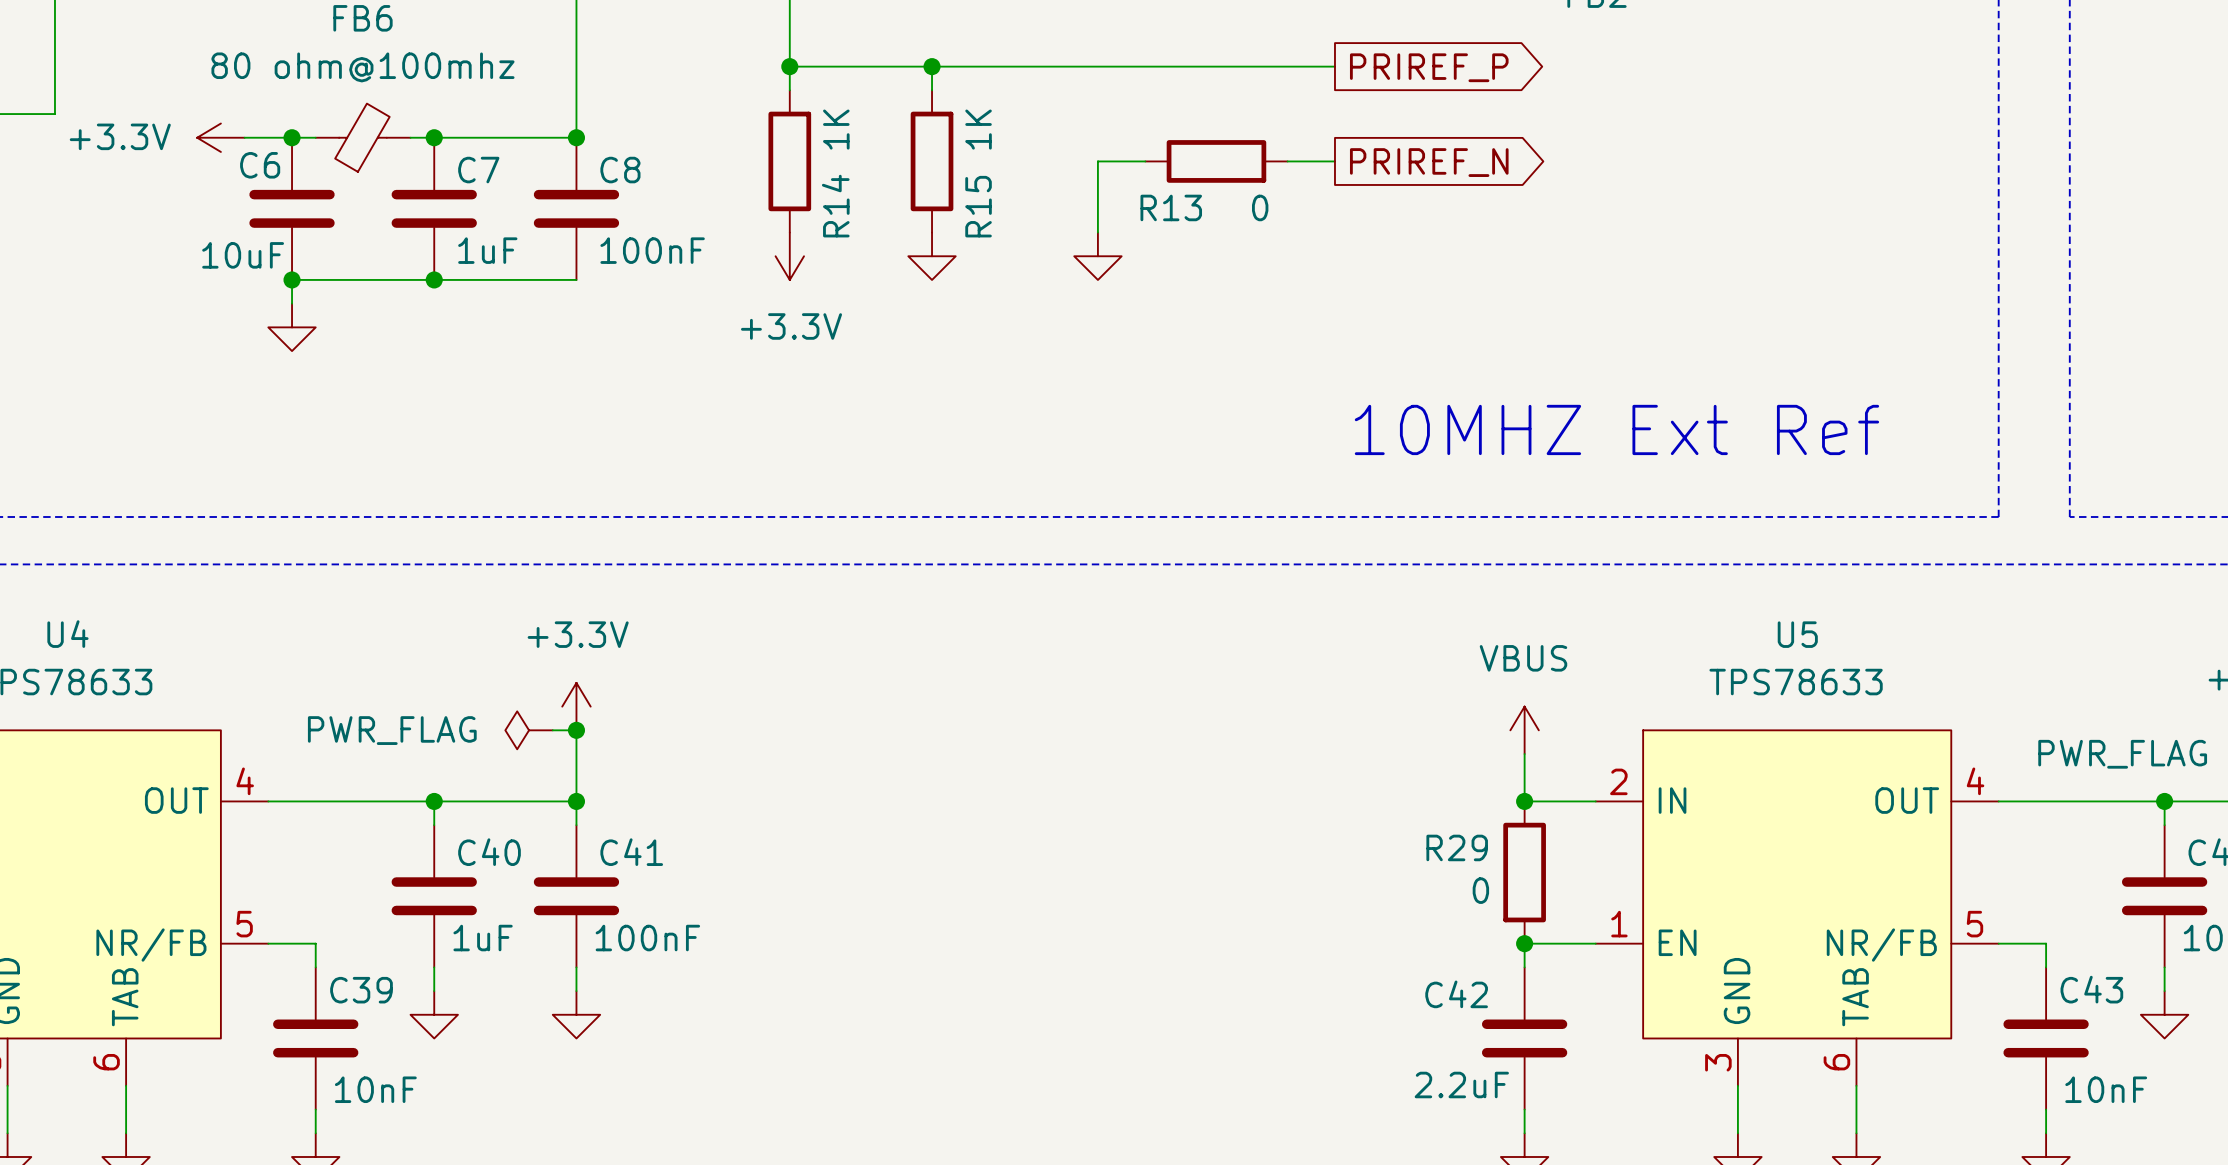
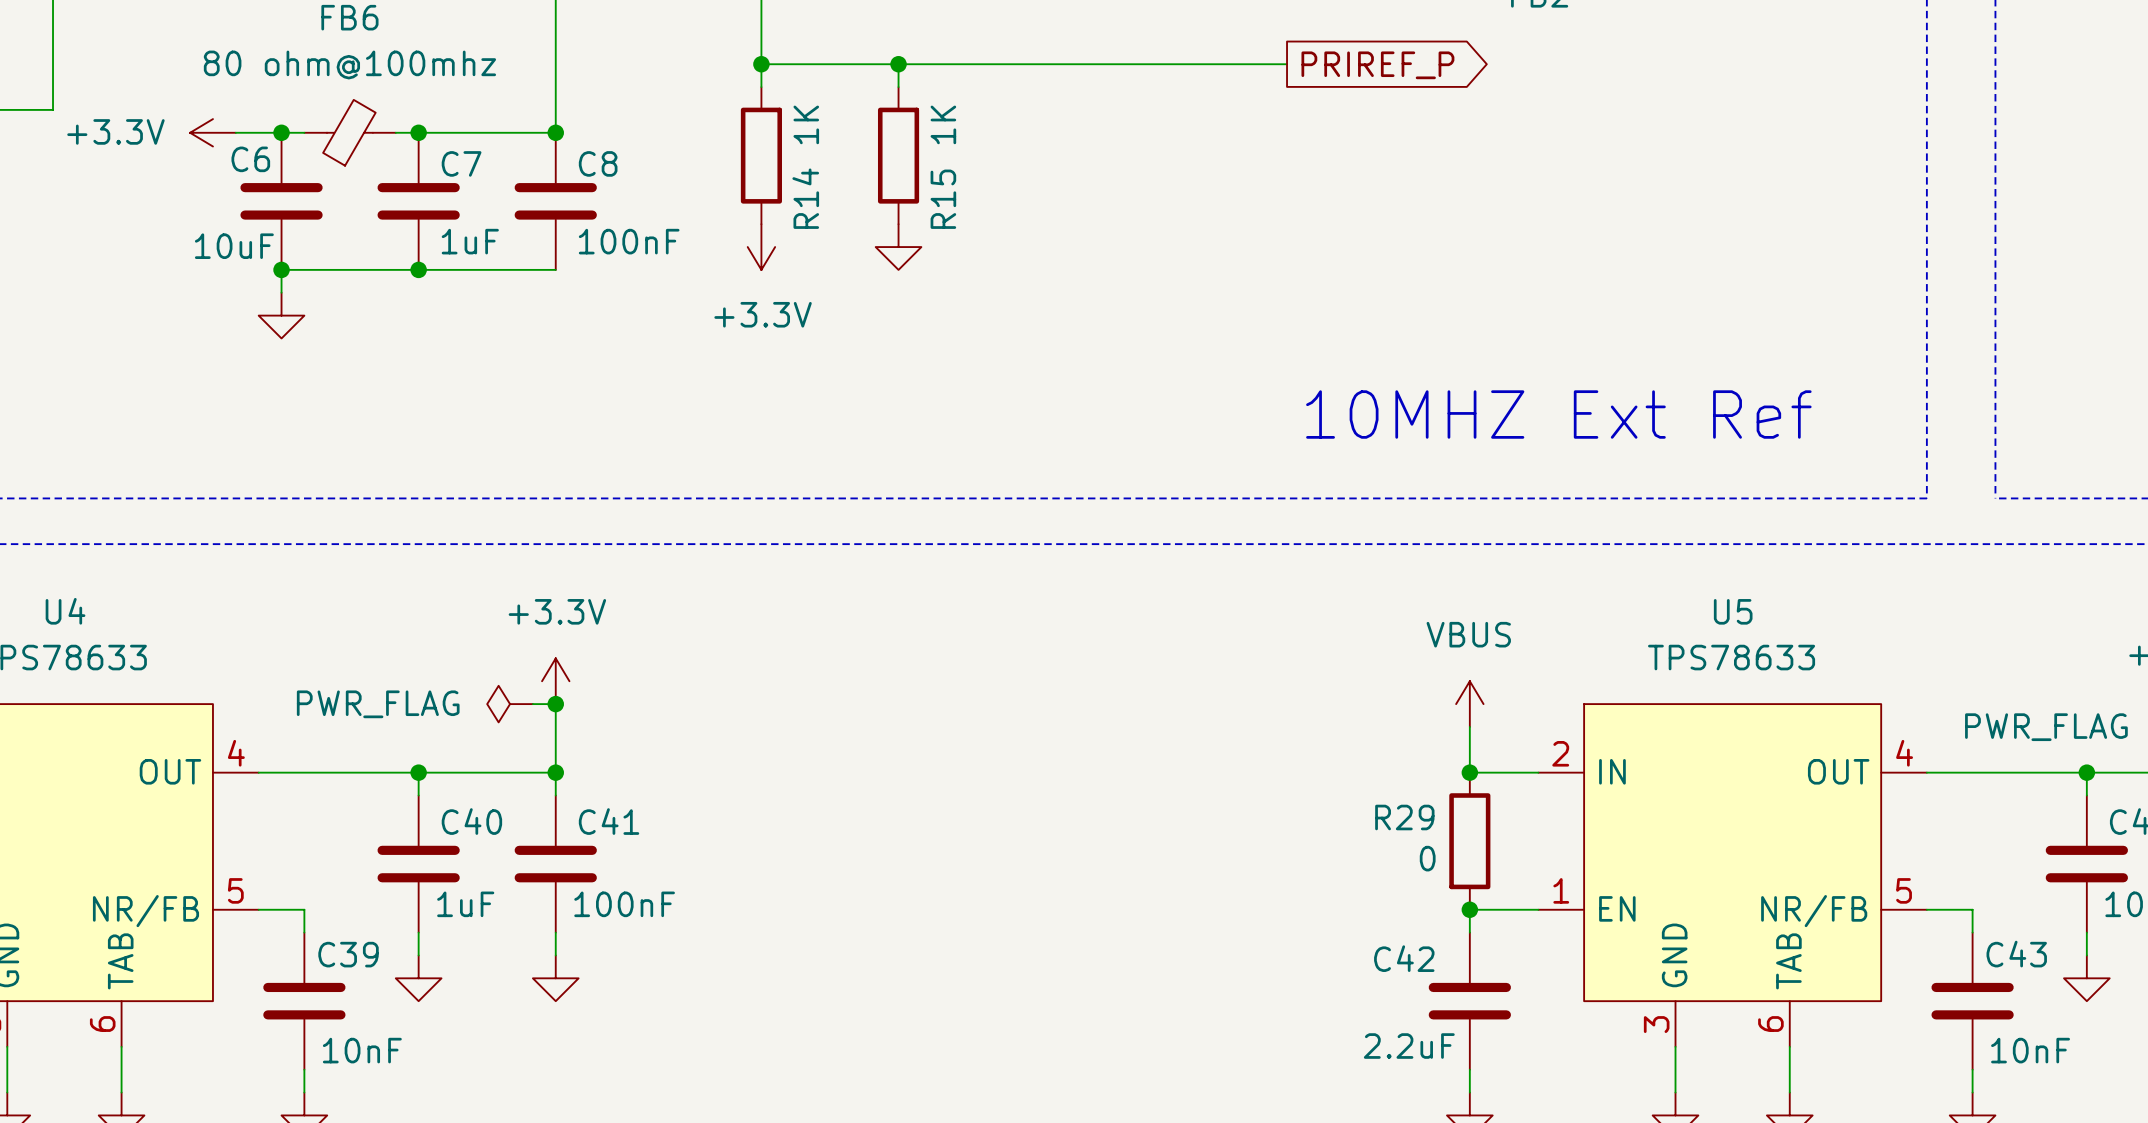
wire: (1145, 161) (1097, 161) (1097, 232) -> none
R13: 0 (1216, 161) -> none
wire: (1287, 161) (1334, 161) -> none
global label: PRIREF_N (1429, 162) -> none
power symbol: (1097, 256) -> none

